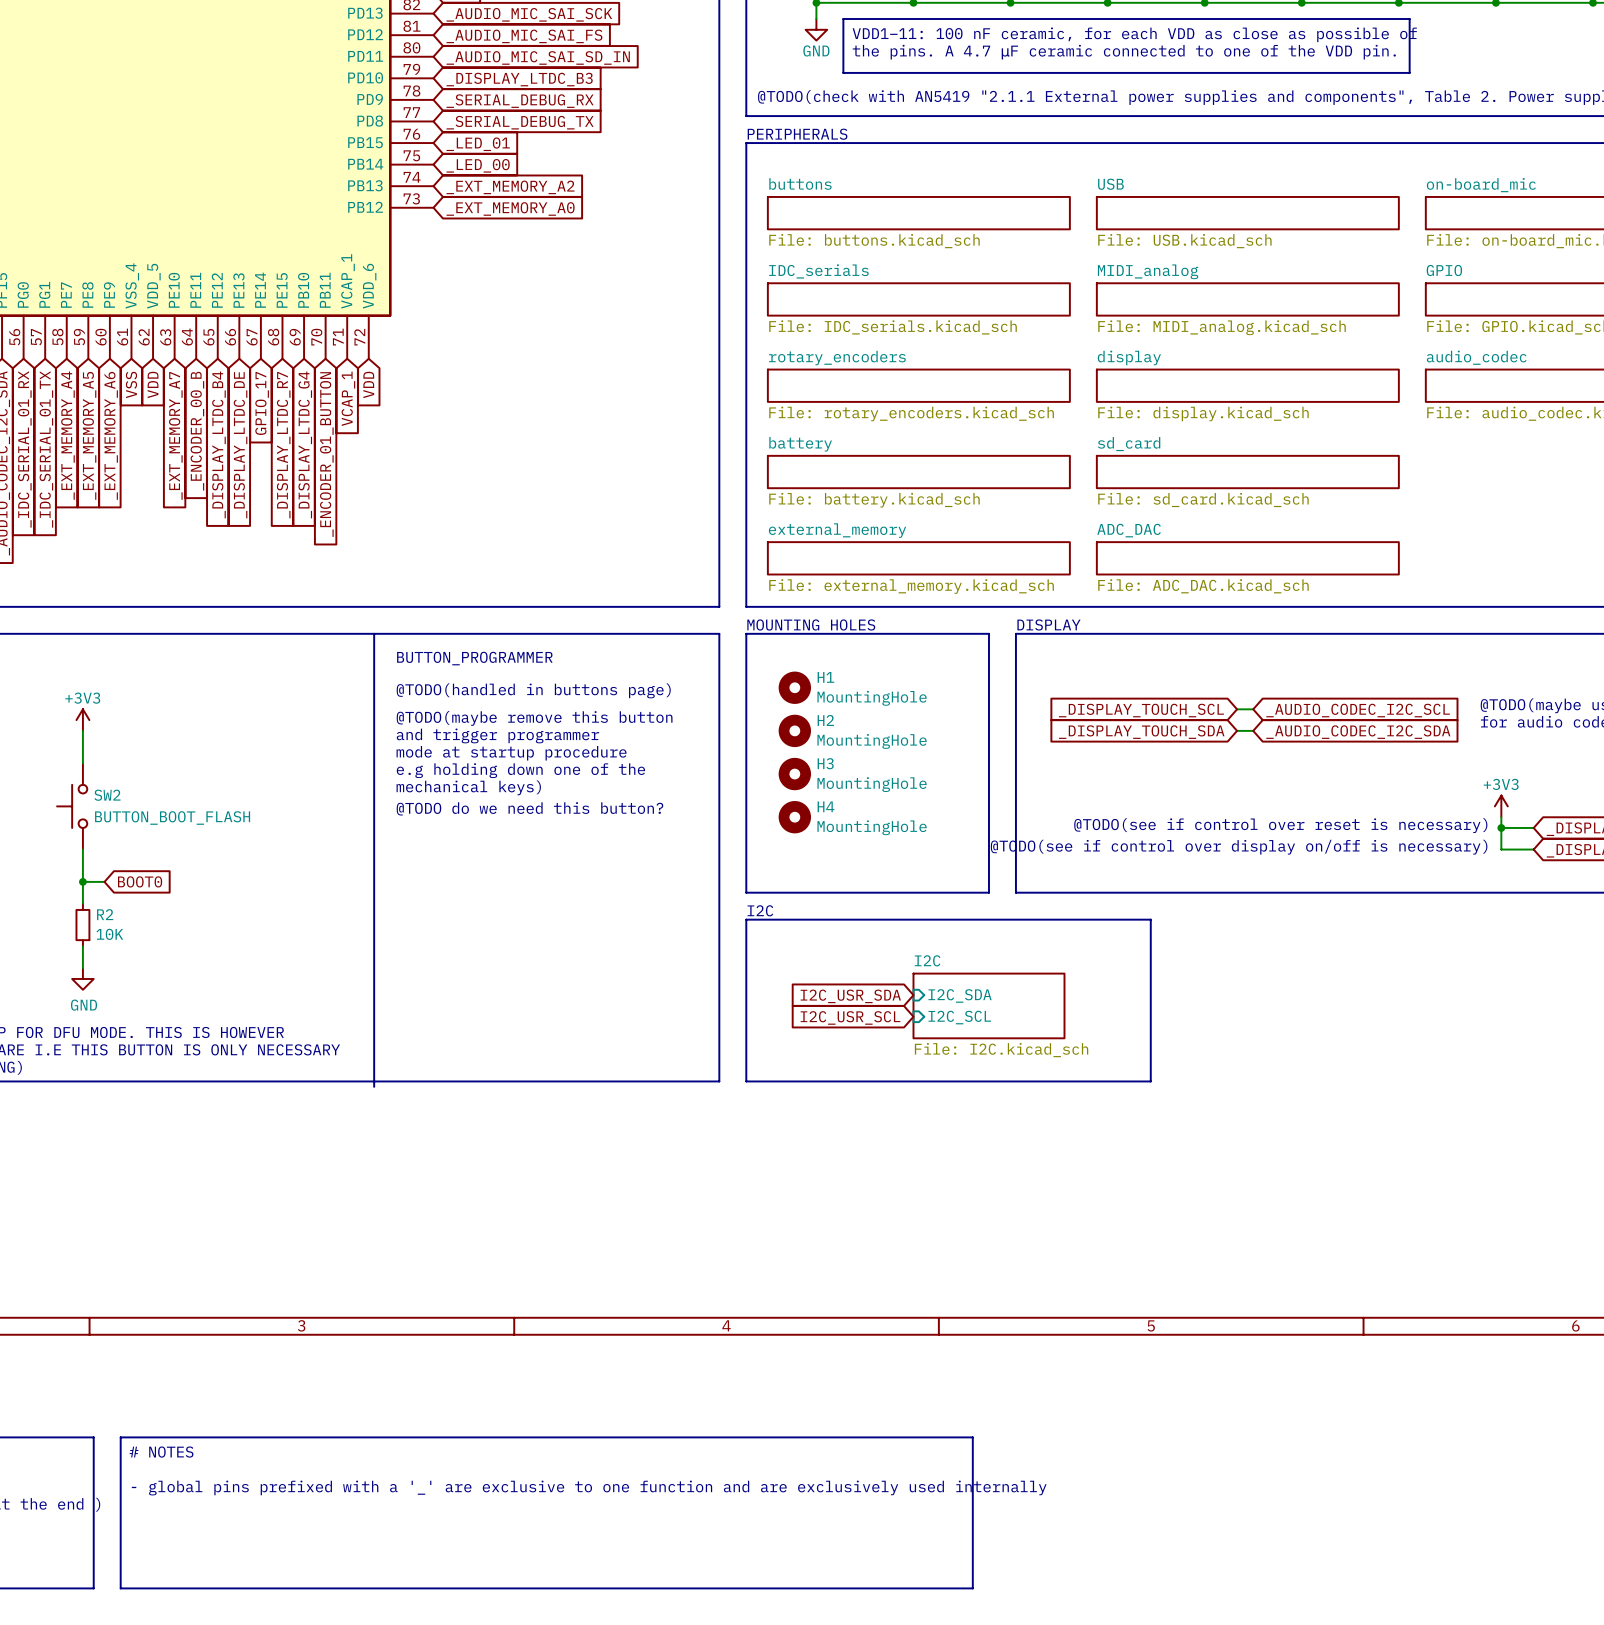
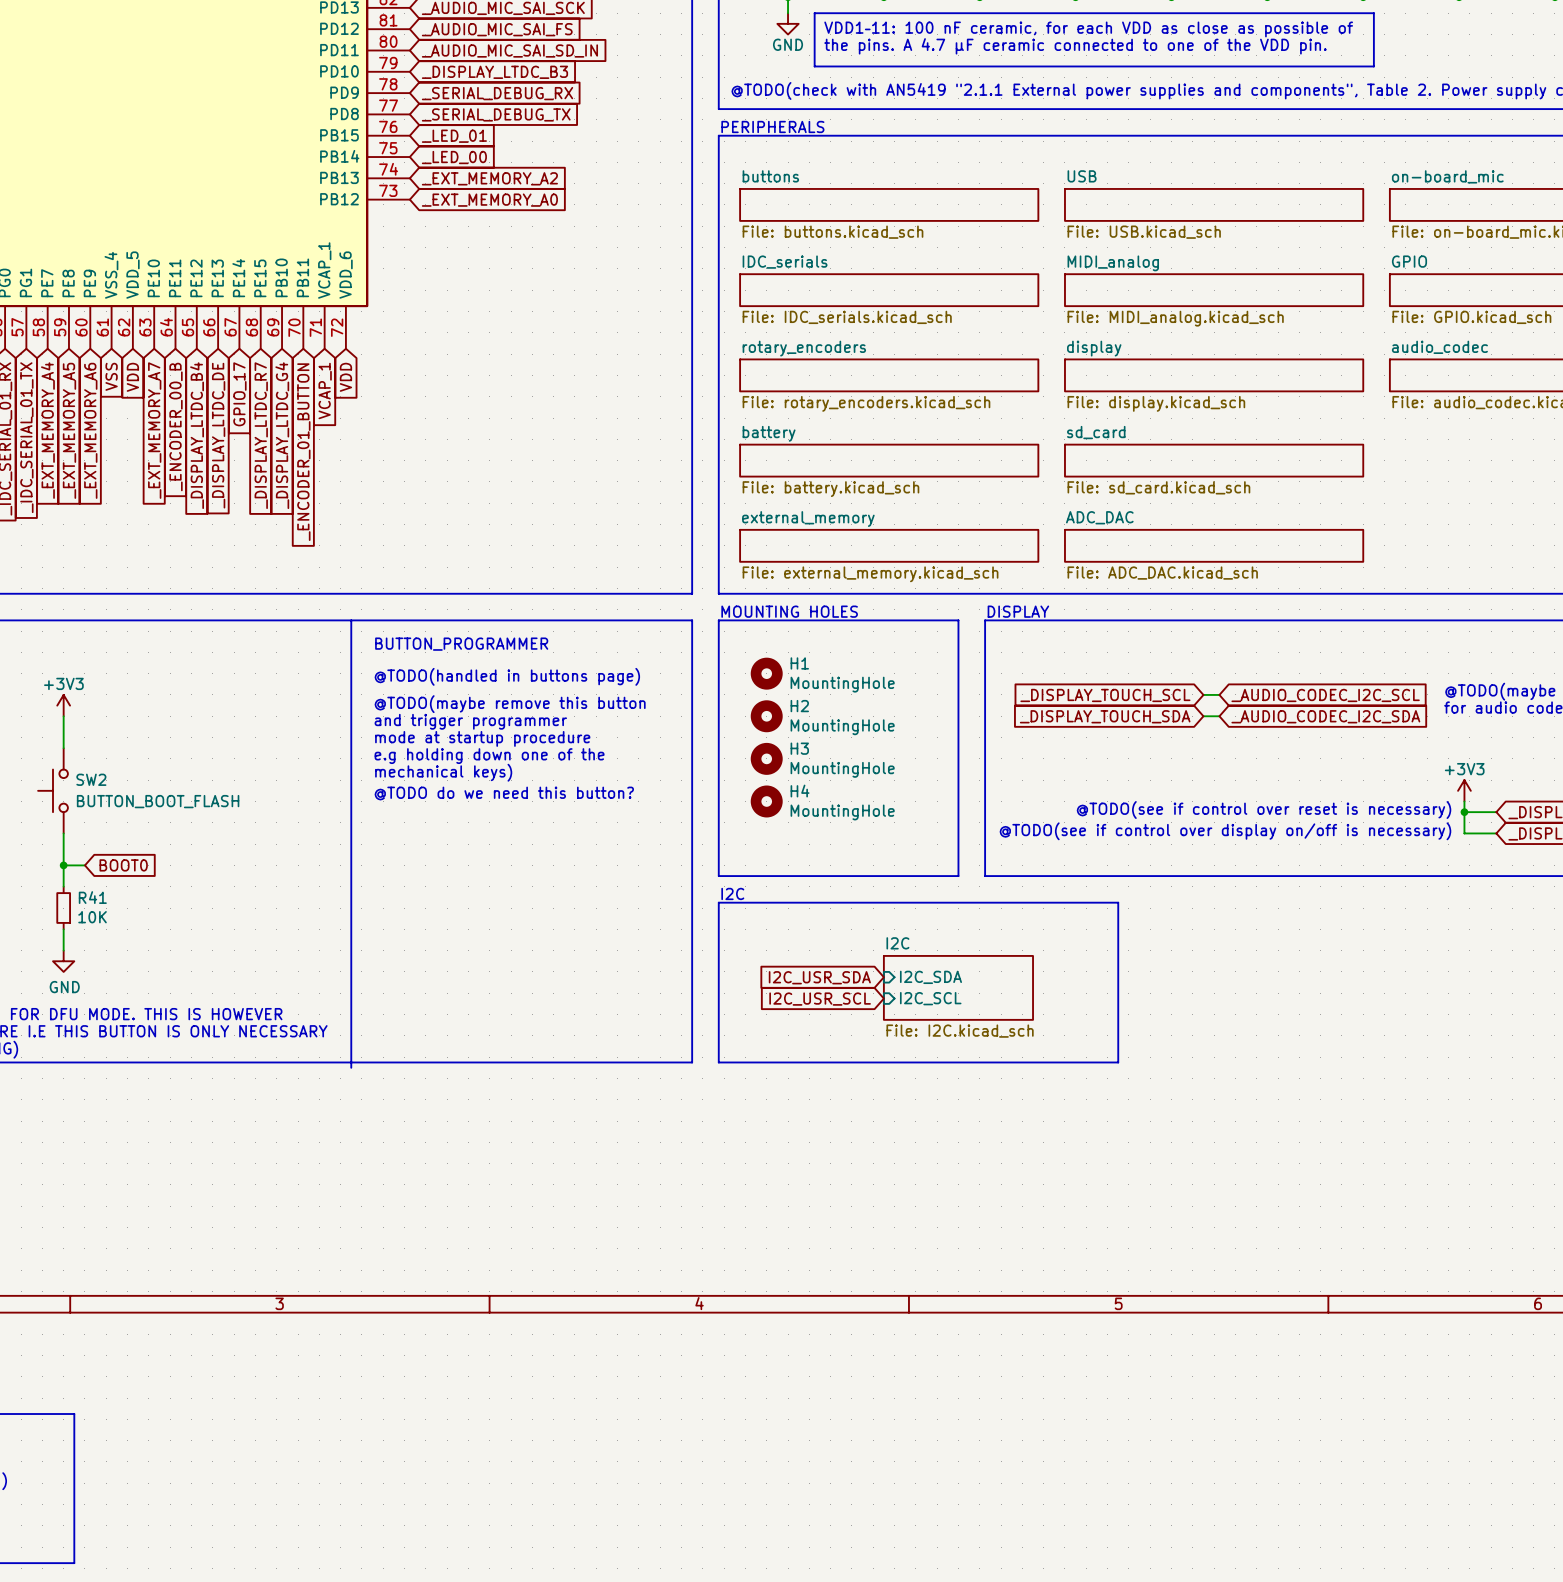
R2 name: R2 (105, 914) -> R41 (92, 897)
line: (120, 1437) (972, 1437) (972, 1588) (120, 1588) (120, 1437) -> none
text: # NOTES (161, 1452) -> none
text: - global pins prefixed with a '_' are exclusive to one function and are exclusively used internally (589, 1488) -> none

